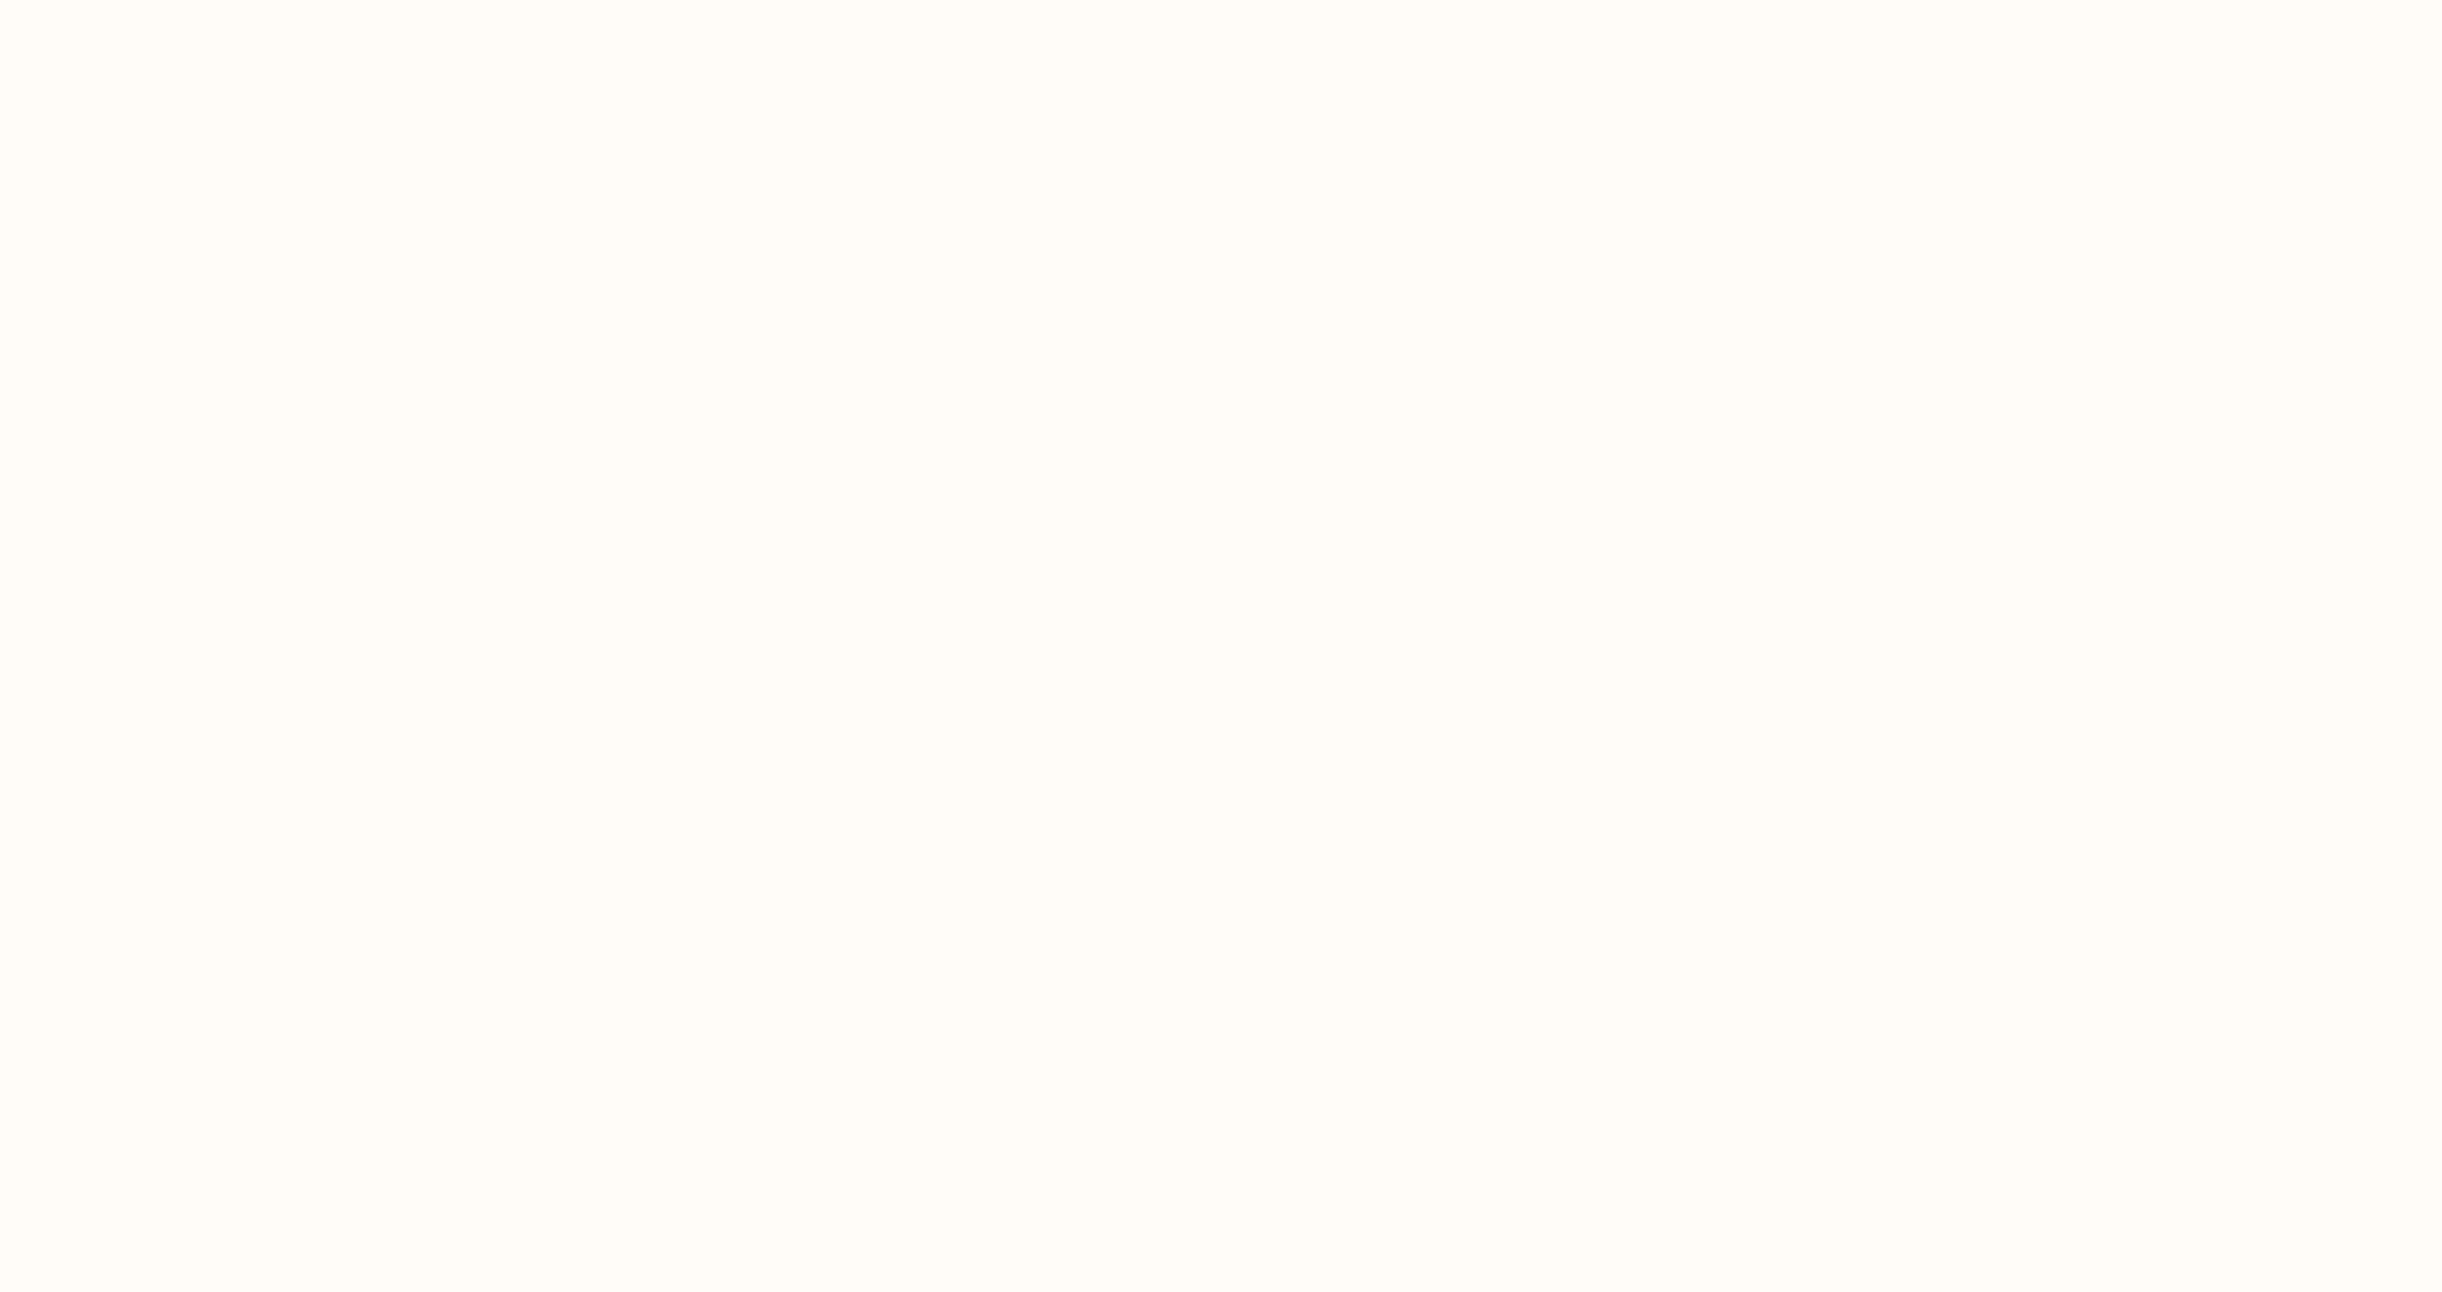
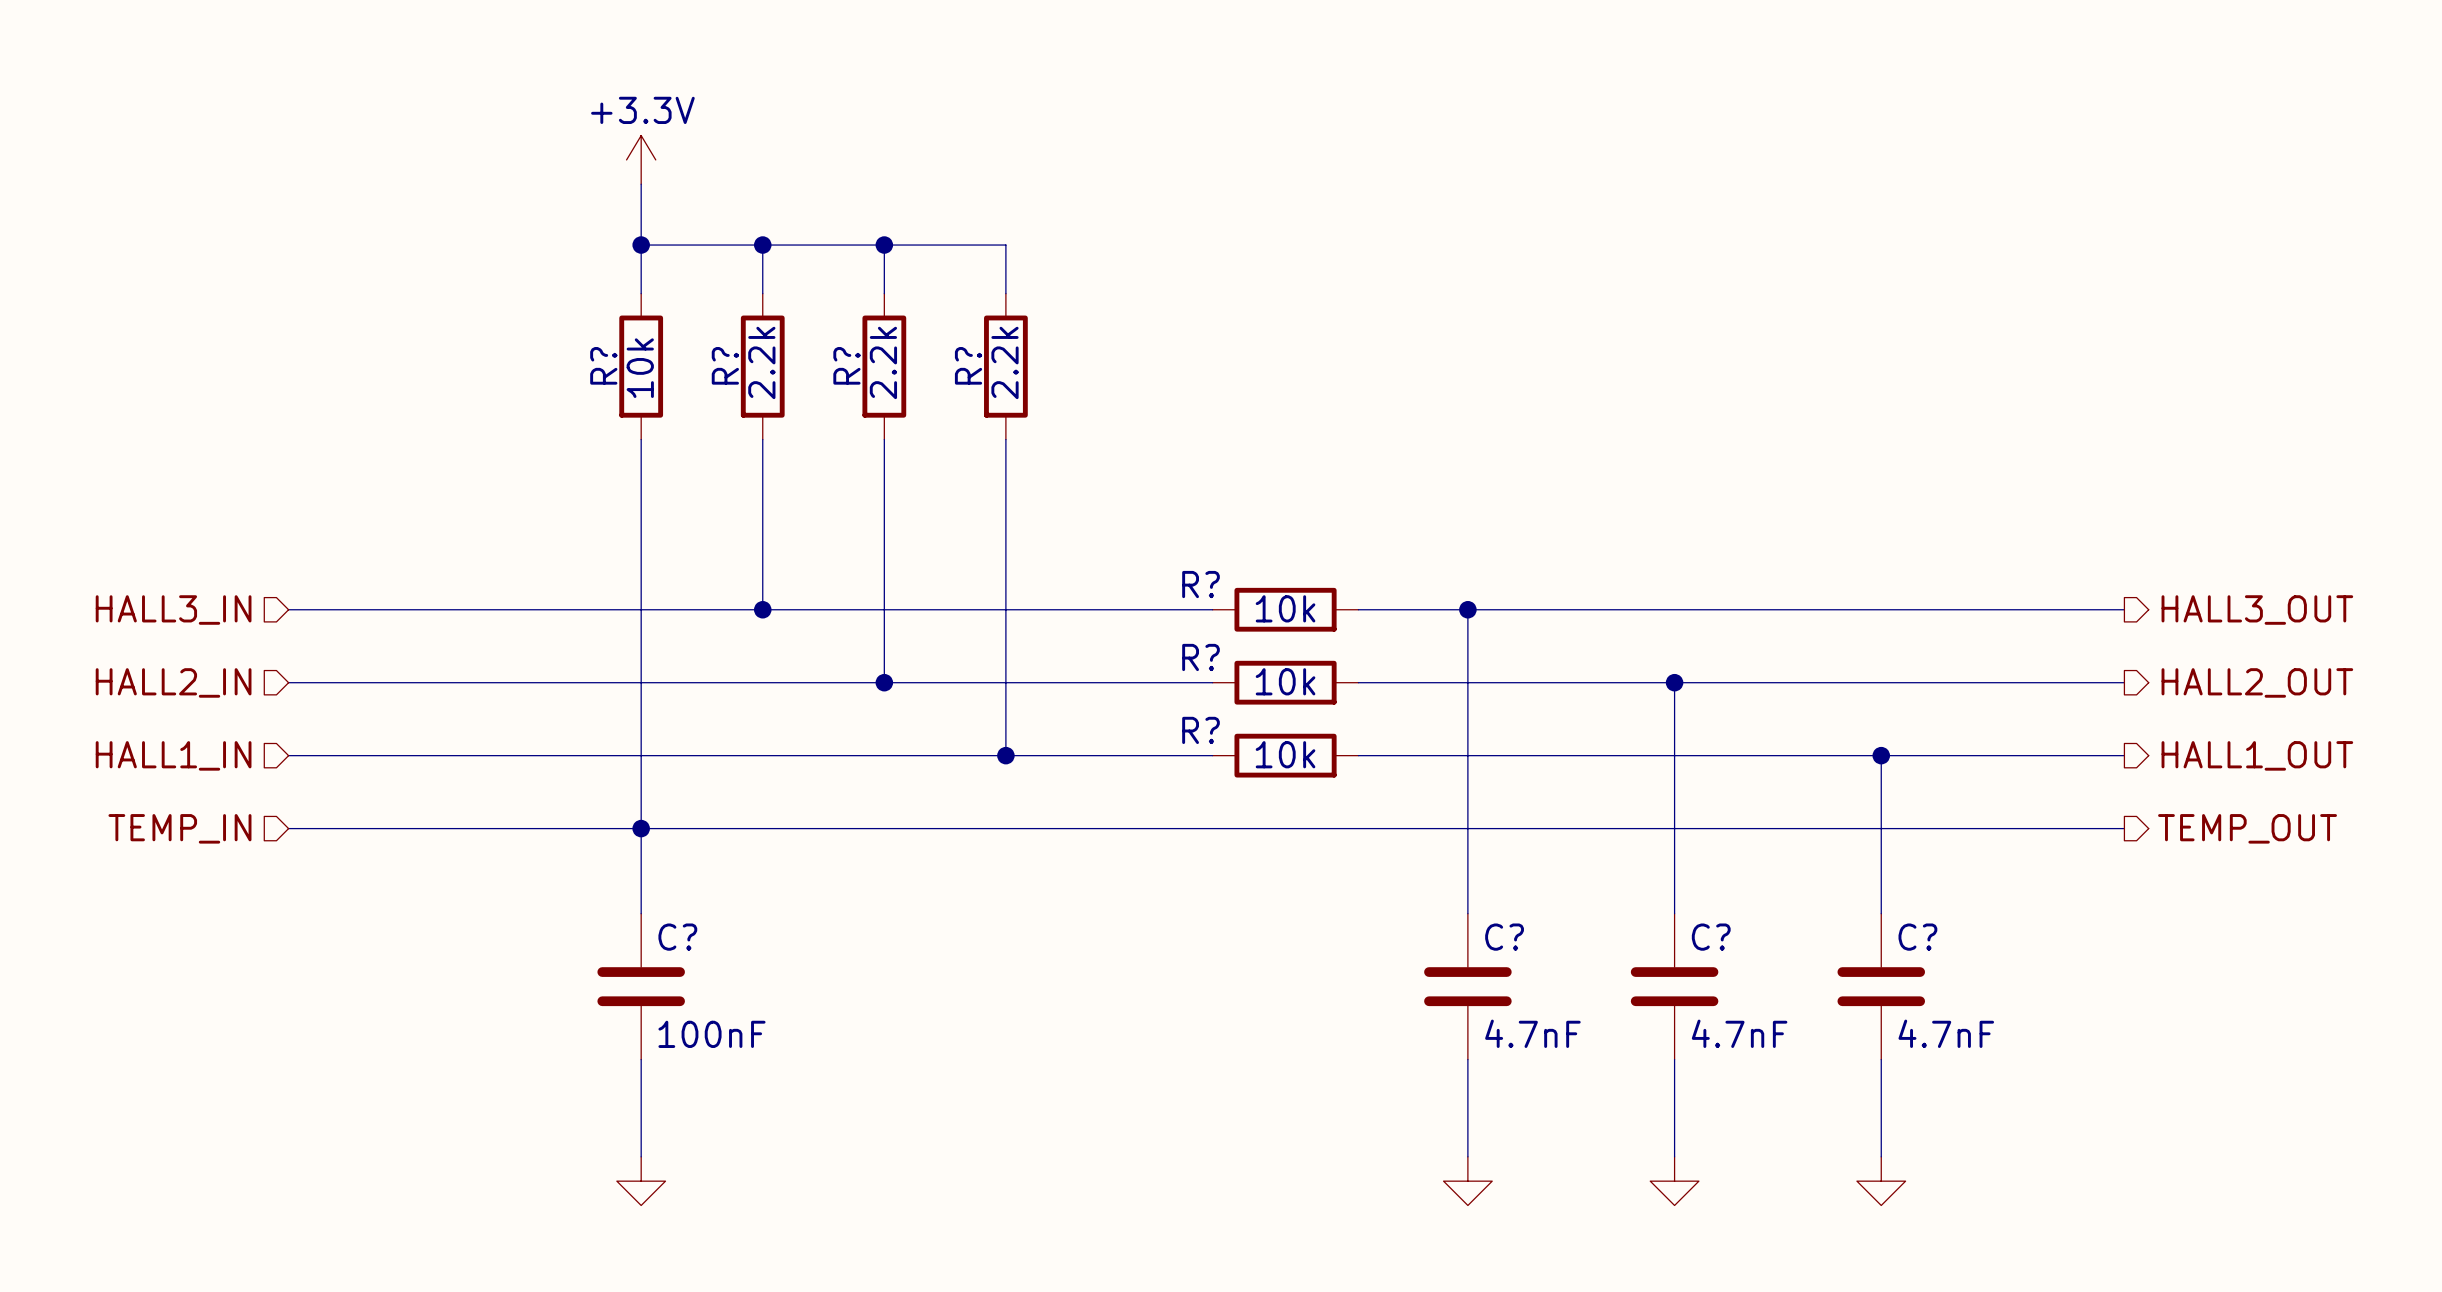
power symbol: none -> +3.3V (641, 159)
wire: none -> (641, 184) (641, 293)
wire: none -> (641, 245) (1005, 245) (1005, 293)
junction: none -> (641, 245)
wire: none -> (762, 245) (762, 293)
junction: none -> (762, 245)
wire: none -> (884, 245) (884, 293)
junction: none -> (884, 245)
R?: none -> 10k (641, 366)
R?: none -> 2.2k (762, 366)
R?: none -> 2.2k (884, 366)
R?: none -> 2.2k (1005, 366)
wire: none -> (641, 439) (641, 913)
wire: none -> (762, 439) (762, 609)
wire: none -> (884, 439) (884, 682)
wire: none -> (1005, 439) (1005, 755)
wire: none -> (288, 609) (1212, 609)
junction: none -> (762, 609)
R?: none -> 10k (1285, 609)
wire: none -> (1358, 609) (2124, 609)
wire: none -> (1467, 609) (1467, 913)
junction: none -> (1467, 609)
hierarchical label: none -> HALL3_IN (173, 610)
hierarchical label: none -> HALL3_OUT (2257, 610)
hierarchical label: none -> HALL2_IN (173, 682)
wire: none -> (288, 682) (1212, 682)
junction: none -> (884, 682)
R?: none -> 10k (1285, 682)
wire: none -> (1358, 682) (2124, 682)
wire: none -> (1674, 682) (1674, 913)
junction: none -> (1674, 682)
hierarchical label: none -> HALL2_OUT (2257, 682)
hierarchical label: none -> HALL1_IN (173, 755)
wire: none -> (288, 755) (1212, 755)
junction: none -> (1005, 755)
R?: none -> 10k (1285, 755)
wire: none -> (1358, 755) (2124, 755)
wire: none -> (1881, 755) (1881, 913)
junction: none -> (1881, 755)
hierarchical label: none -> HALL1_OUT (2257, 755)
hierarchical label: none -> TEMP_IN (179, 828)
wire: none -> (288, 828) (2124, 828)
junction: none -> (641, 828)
hierarchical label: none -> TEMP_OUT (2247, 828)
C?: none -> 100nF (641, 986)
C?: none -> 4.7nF (1467, 986)
C?: none -> 4.7nF (1674, 986)
C?: none -> 4.7nF (1881, 986)
wire: none -> (641, 1059) (641, 1156)
wire: none -> (1467, 1059) (1467, 1156)
wire: none -> (1674, 1059) (1674, 1156)
wire: none -> (1881, 1059) (1881, 1156)
power symbol: none -> (641, 1181)
power symbol: none -> (1467, 1181)
power symbol: none -> (1674, 1181)
power symbol: none -> (1881, 1181)

